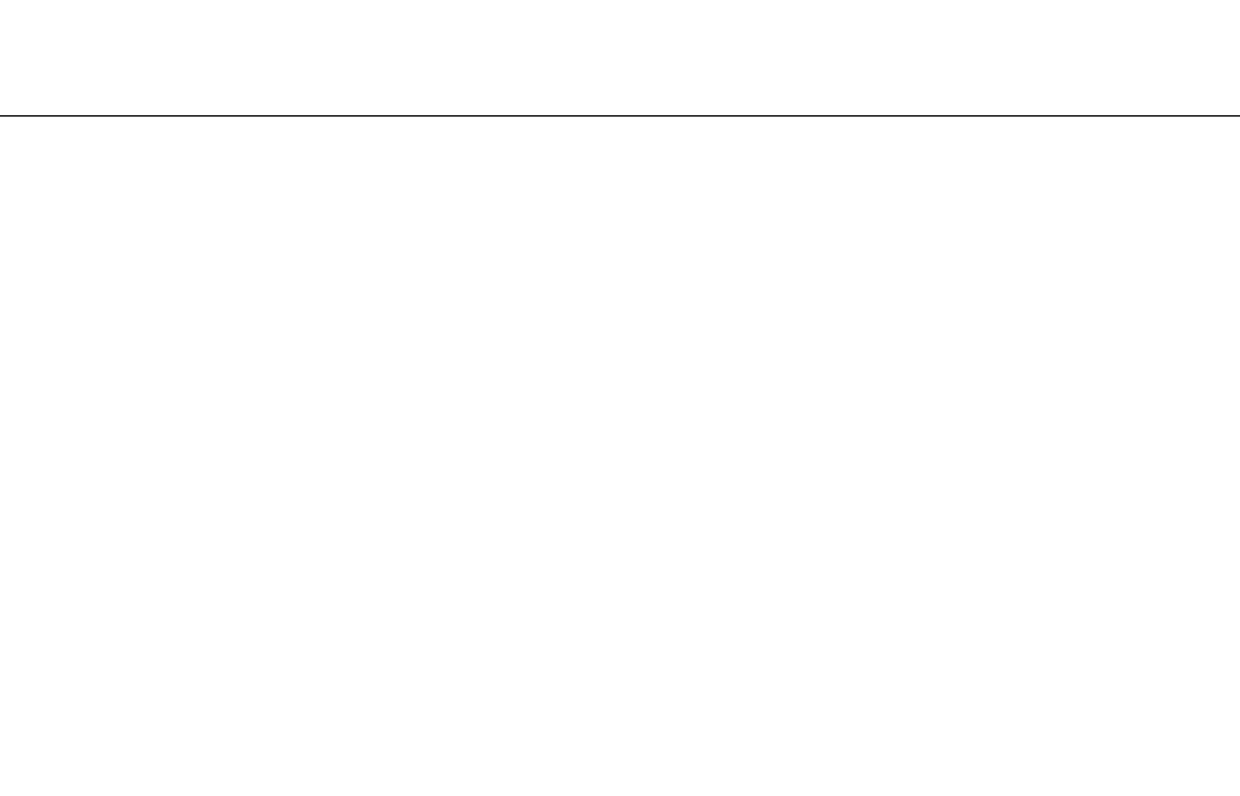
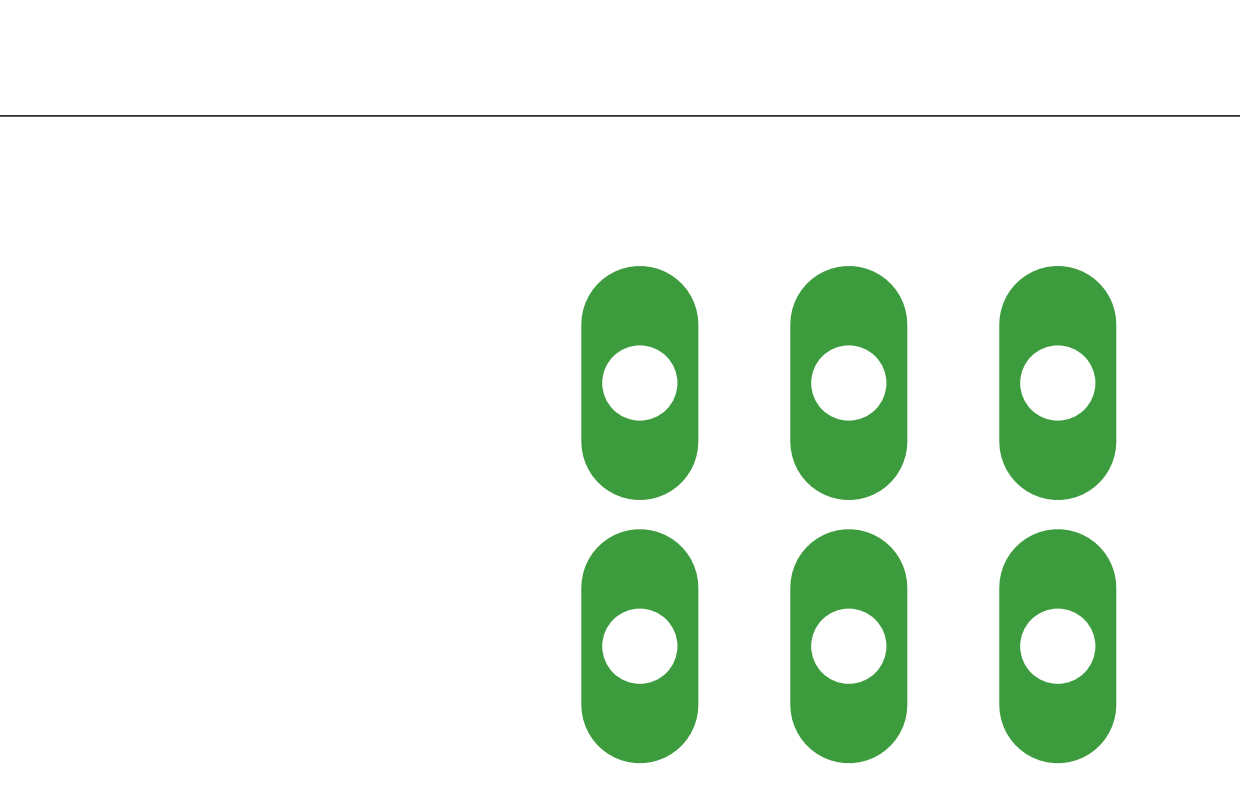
part: none -> (848, 383)
part: none -> (848, 646)

